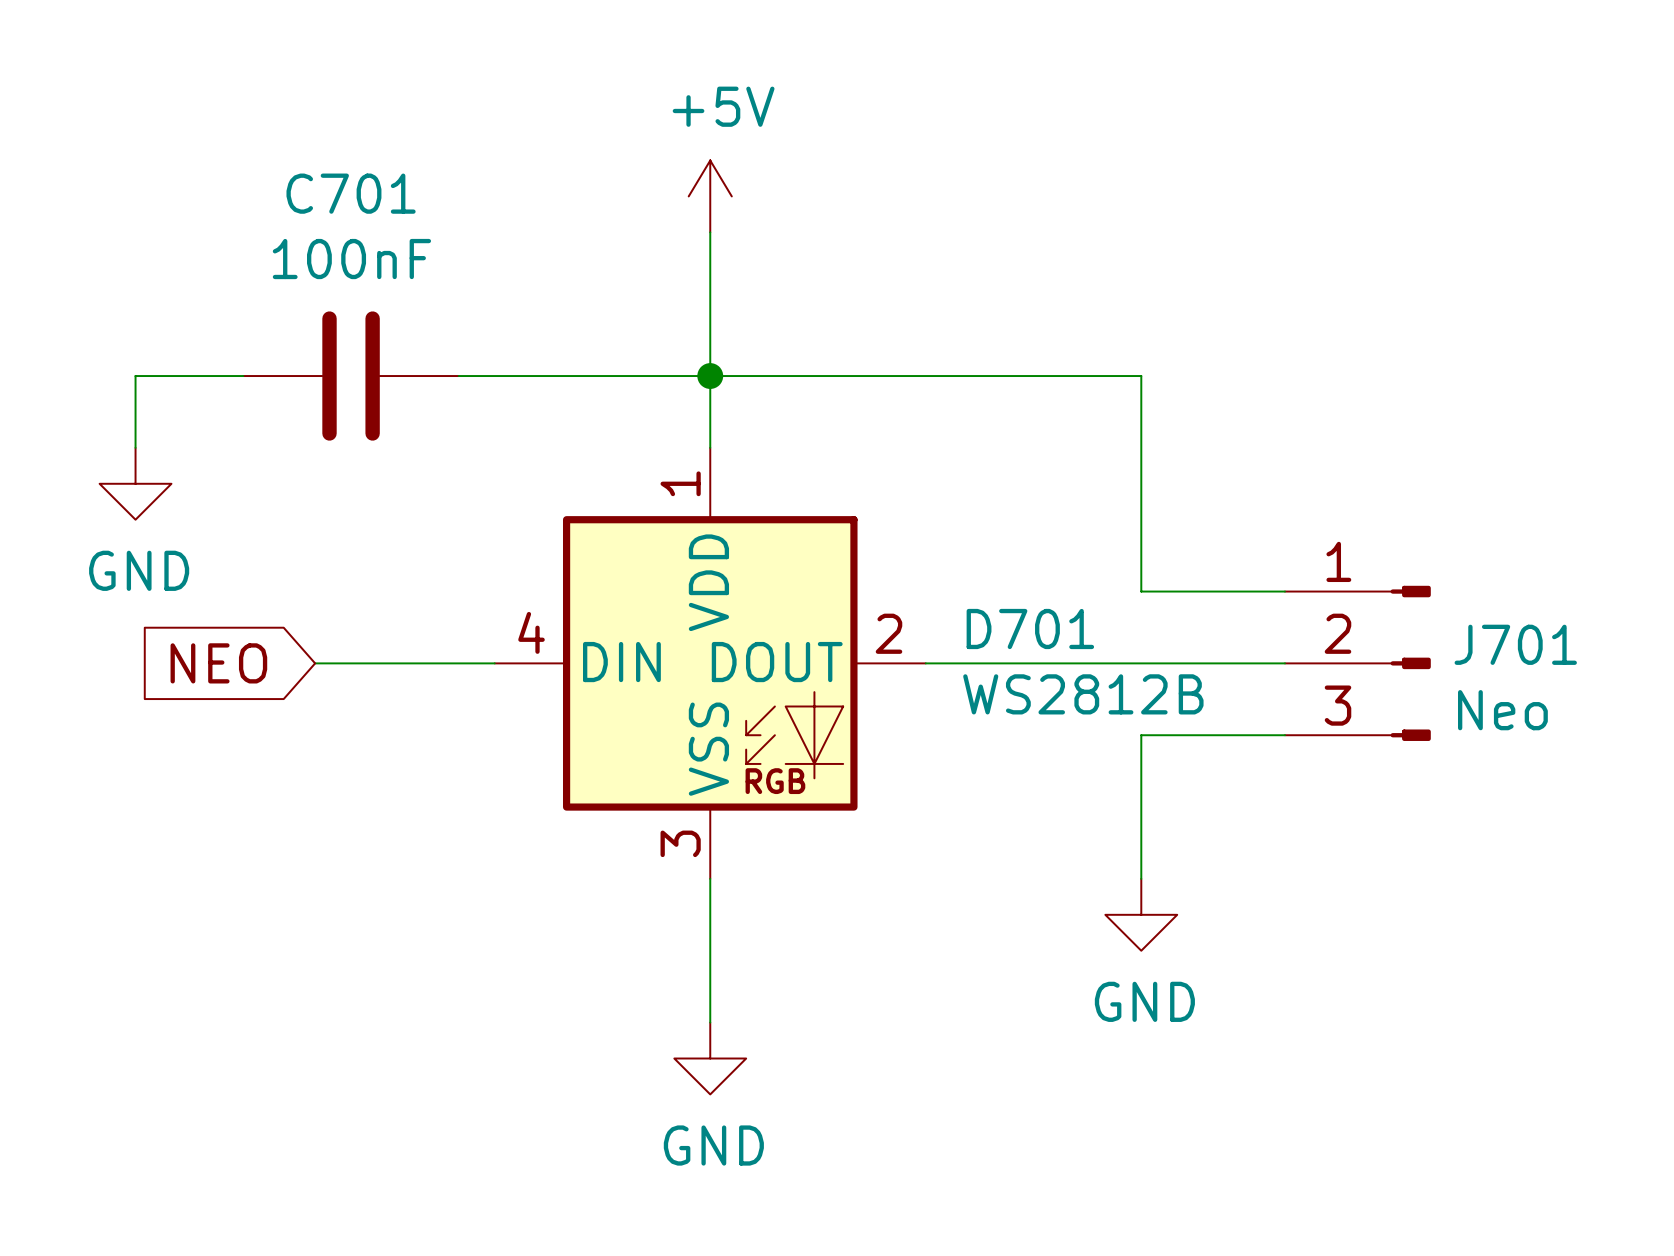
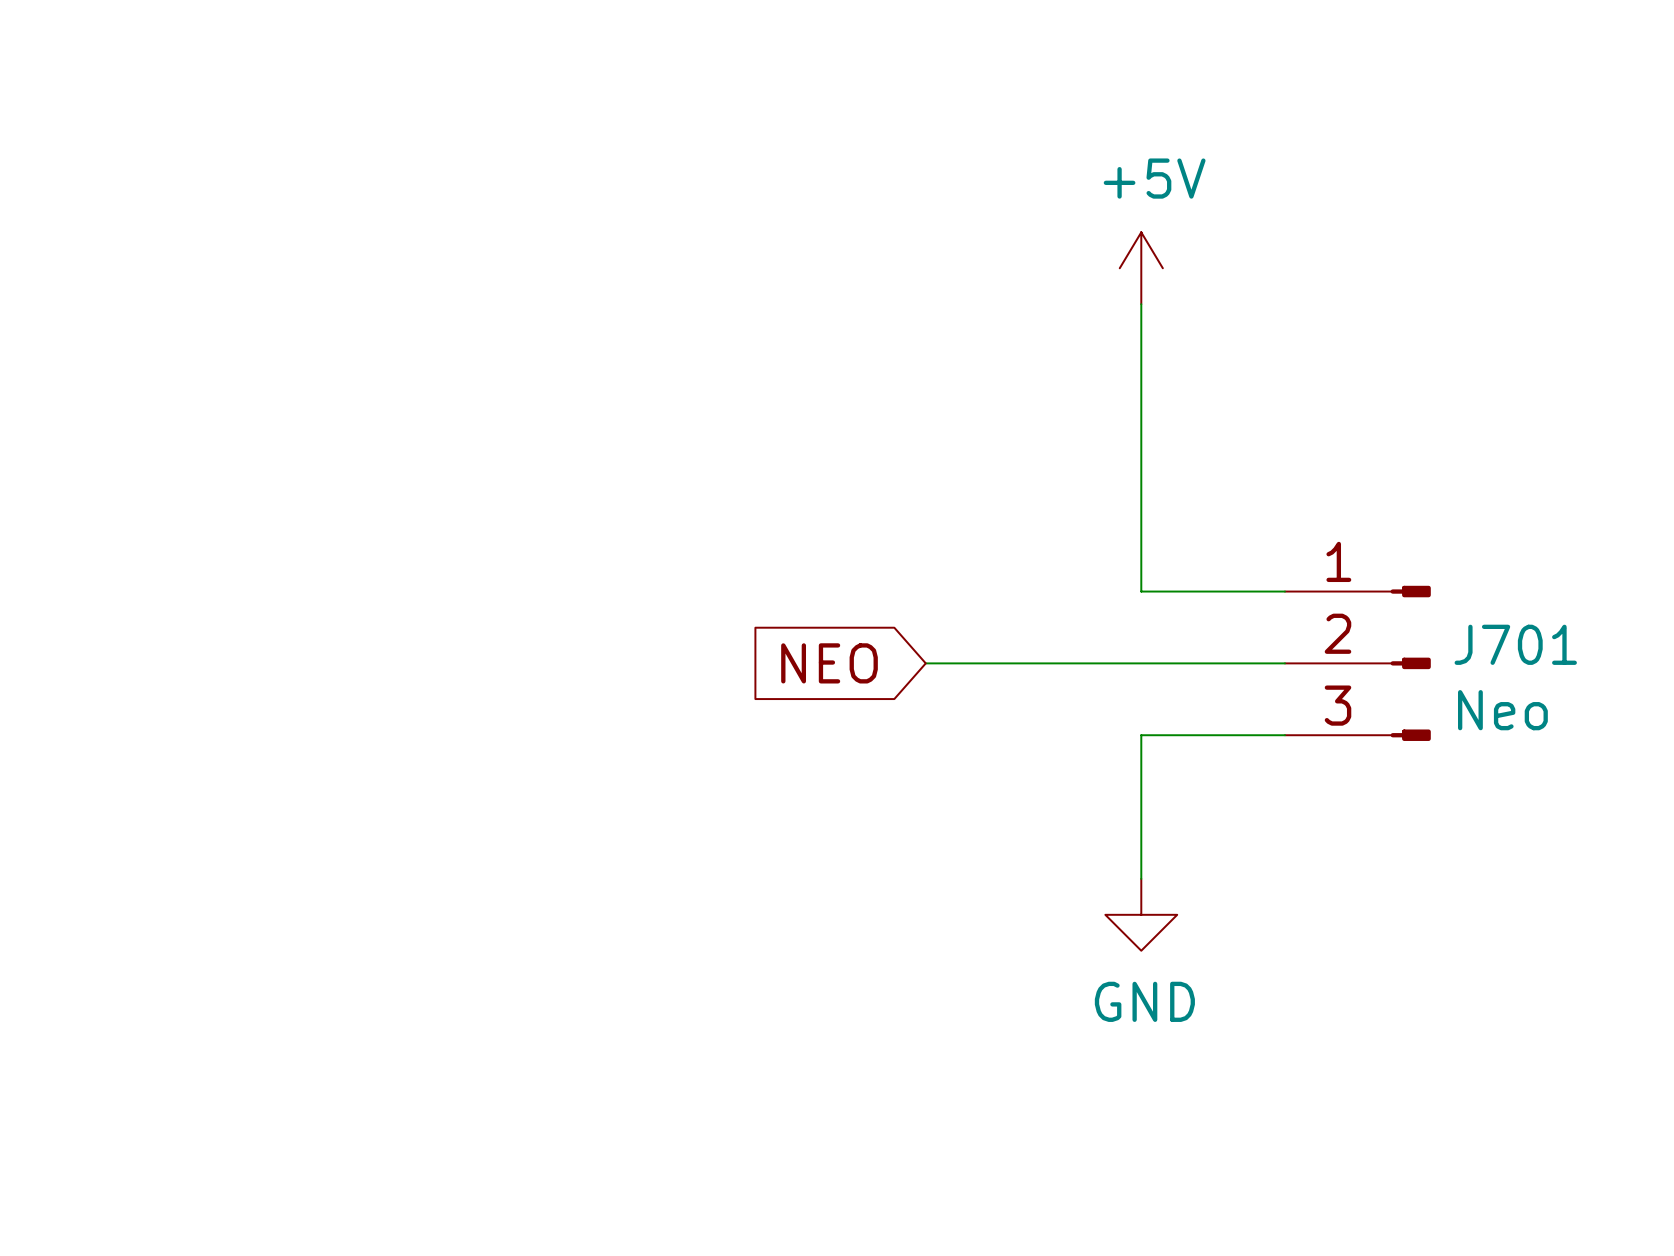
power symbol position: +5V (710, 196) -> +5V (1141, 268)
wire: (710, 232) (710, 447) -> none
wire: (243, 376) (135, 376) (135, 447) -> none
C701: 100nF (351, 376) -> none
wire: (458, 376) (1141, 376) -> (1141, 304) (1141, 376)
junction: (710, 376) -> none
power symbol: GND (135, 483) -> none
global label position: NEO (218, 663) -> NEO (829, 663)
wire: (315, 663) (494, 663) -> none
D701: WS2812B (710, 663) -> none
wire: (710, 878) (710, 1022) -> none
power symbol: GND (710, 1058) -> none

